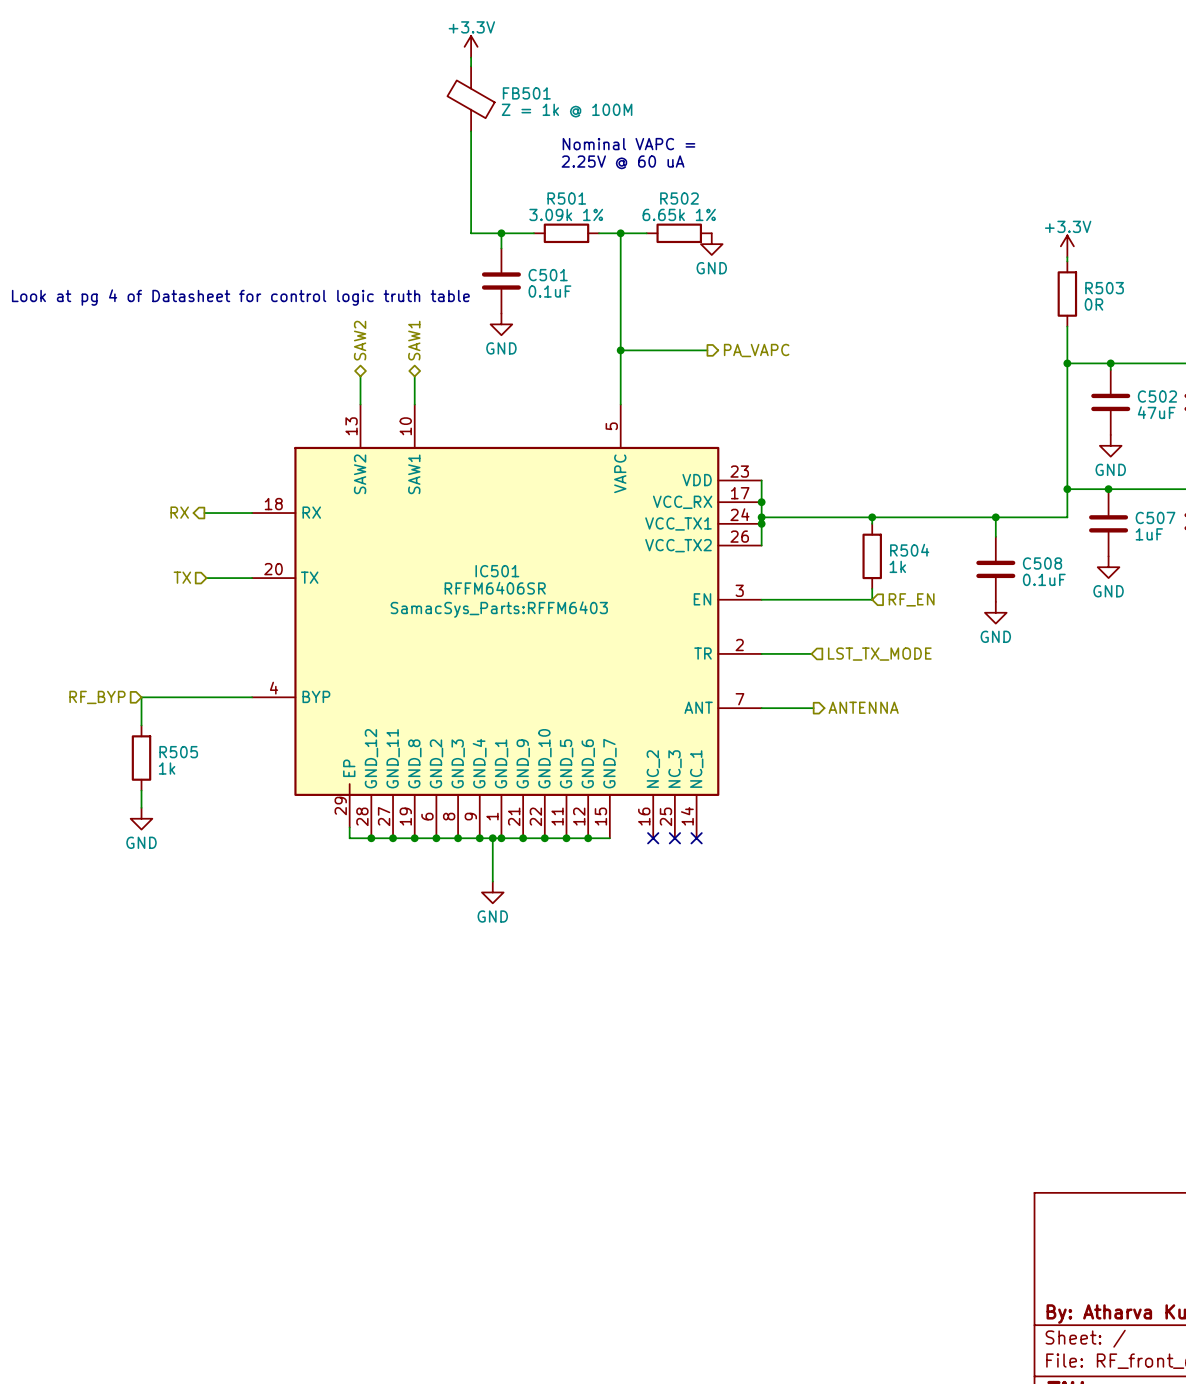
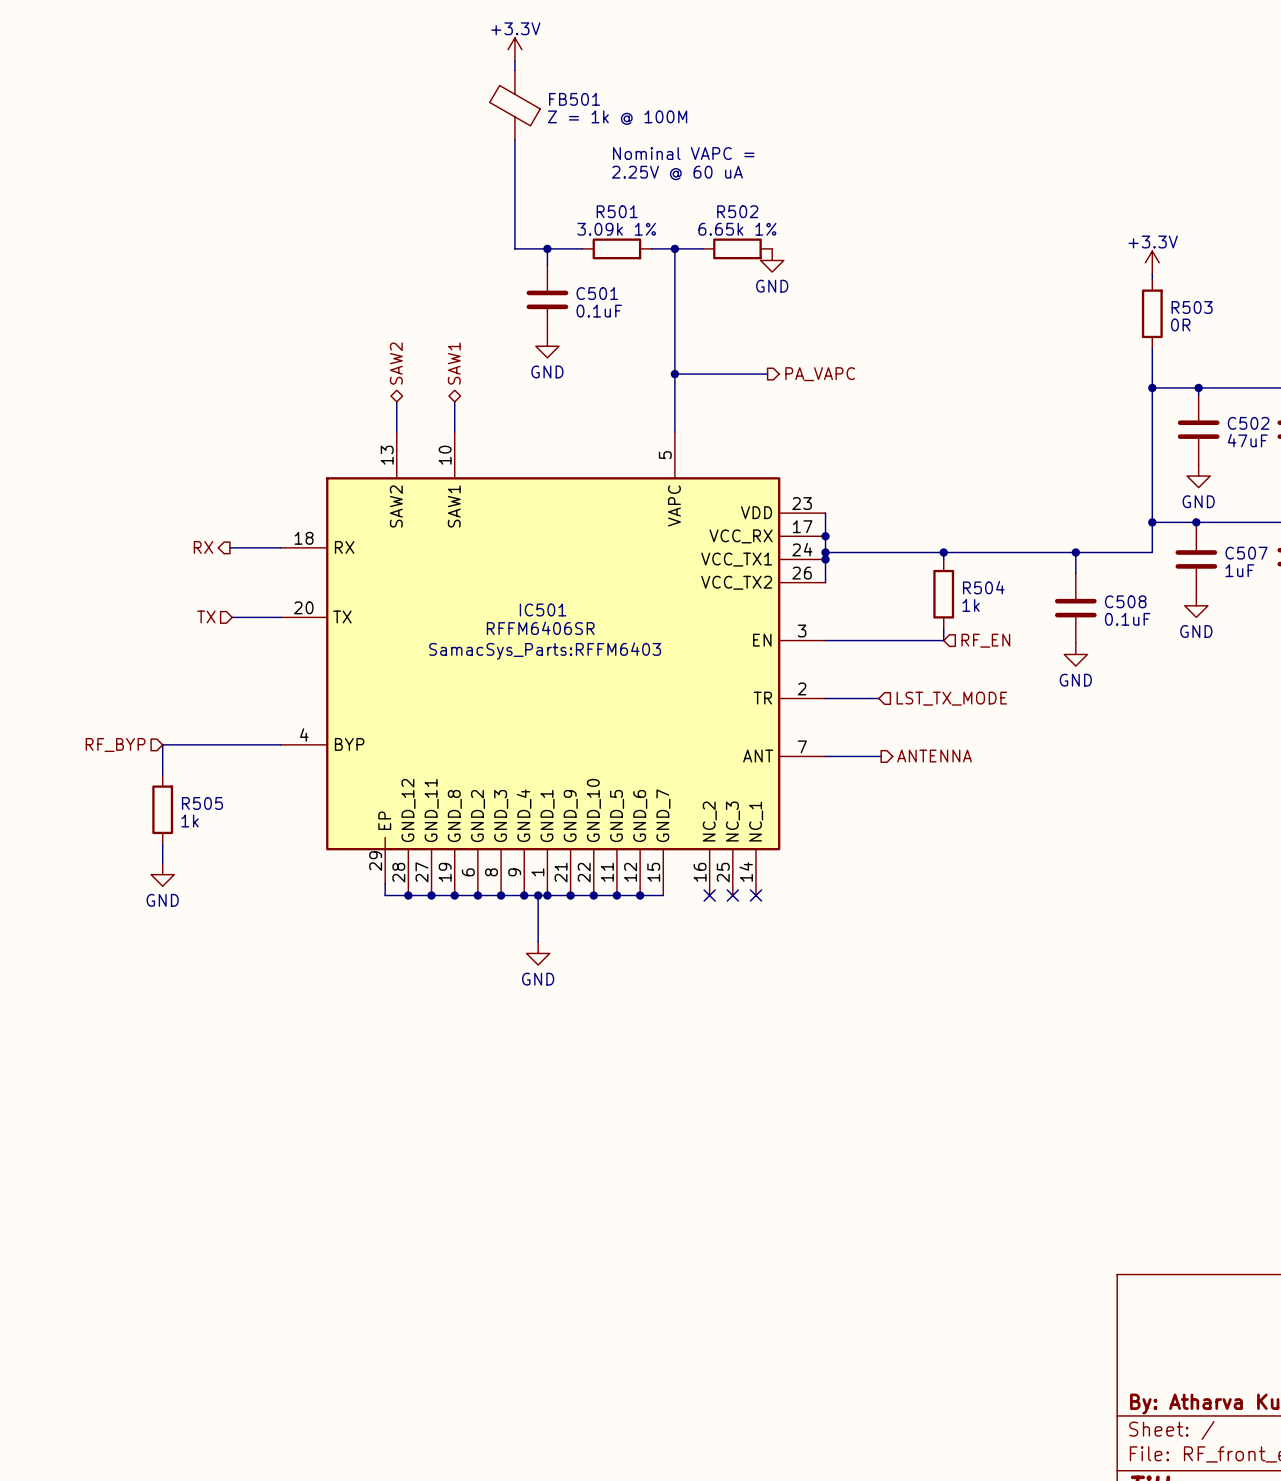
text: Look at pg 4 of Datasheet for control logic truth table (240, 297) -> none

